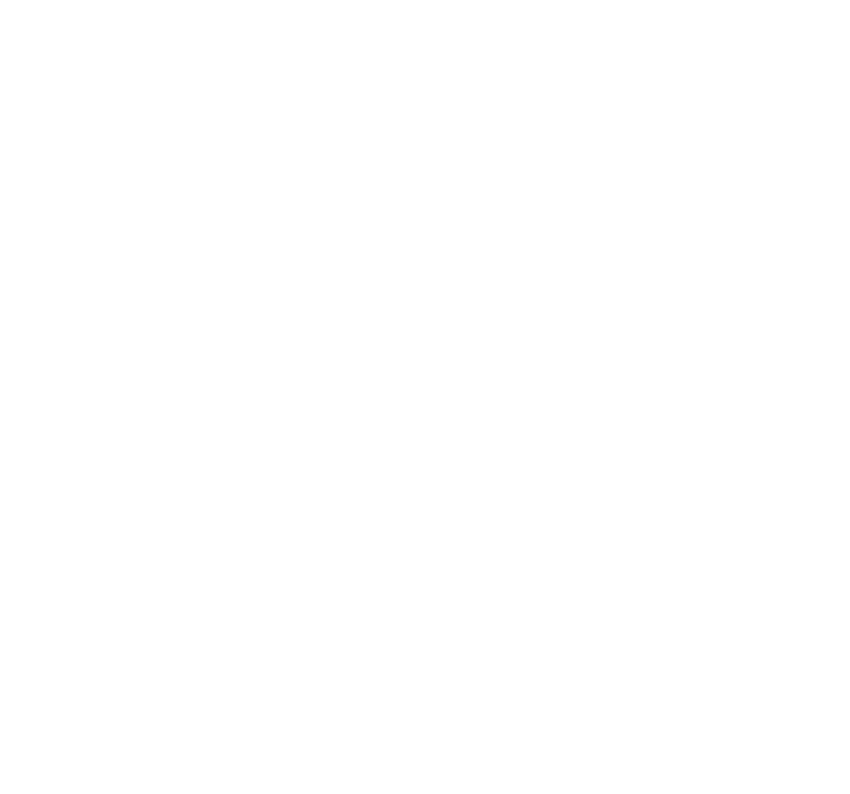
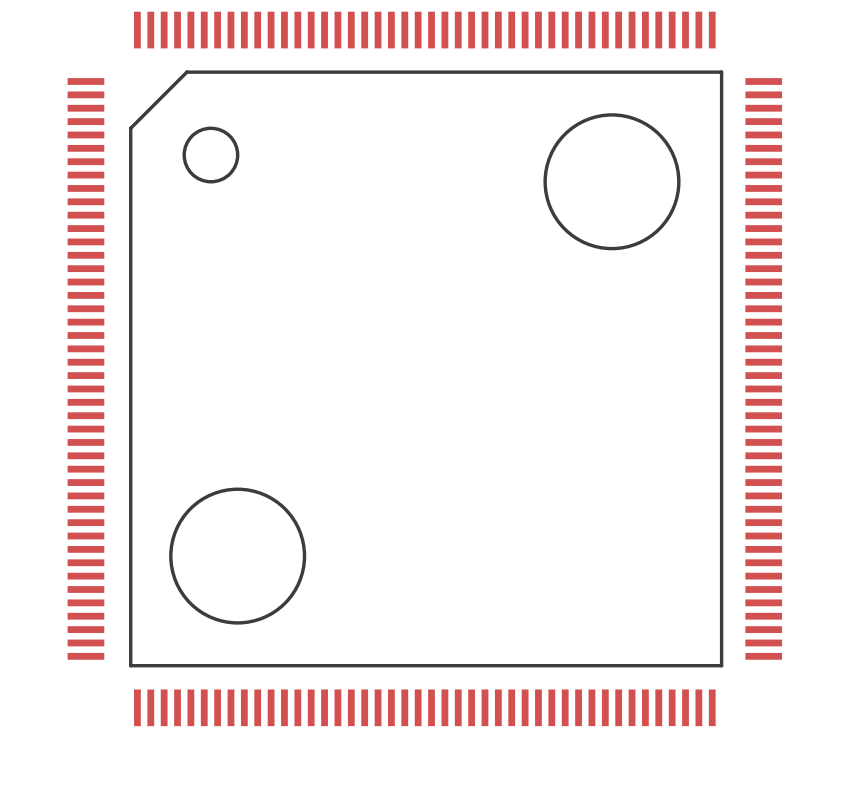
part: none -> (424, 368)

